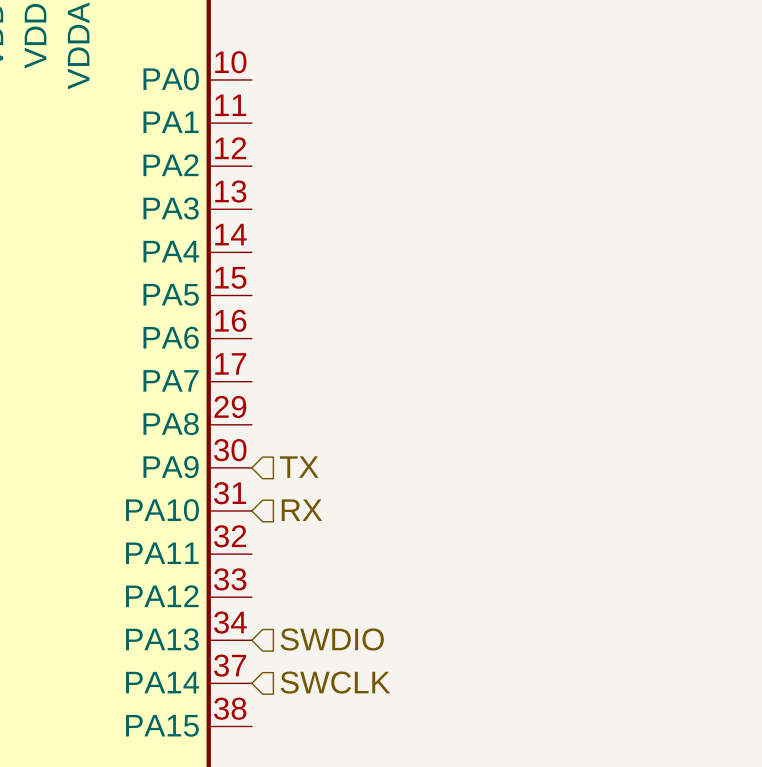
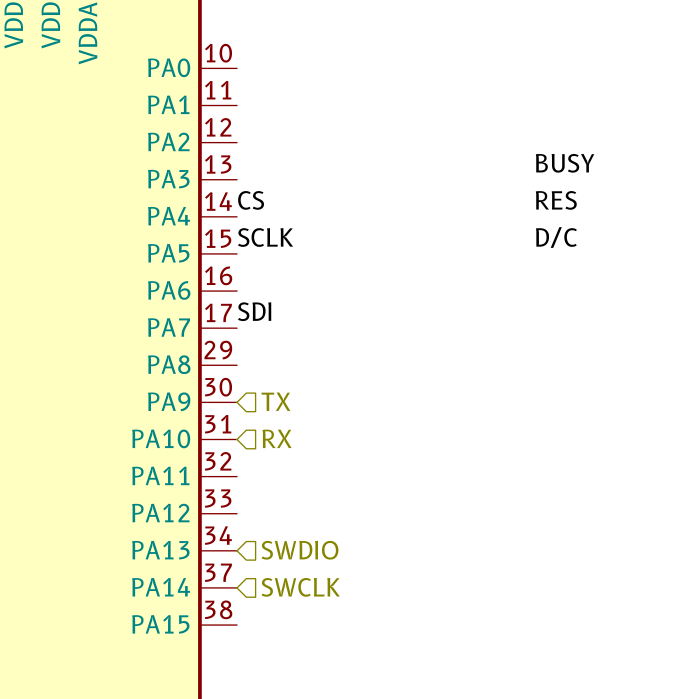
label: none -> BUSY (565, 163)
label: none -> CS (251, 200)
label: none -> RES (556, 200)
label: none -> D/C (556, 237)
label: none -> SCLK (265, 237)
label: none -> SDI (254, 311)

